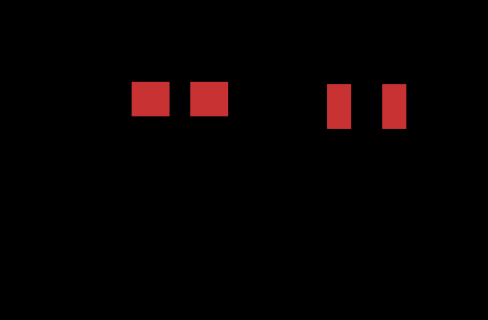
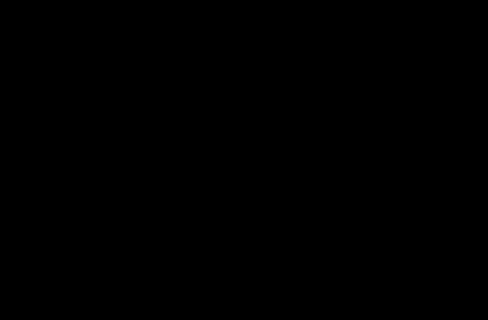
part: (179, 99) -> none
part: (366, 106) -> none

